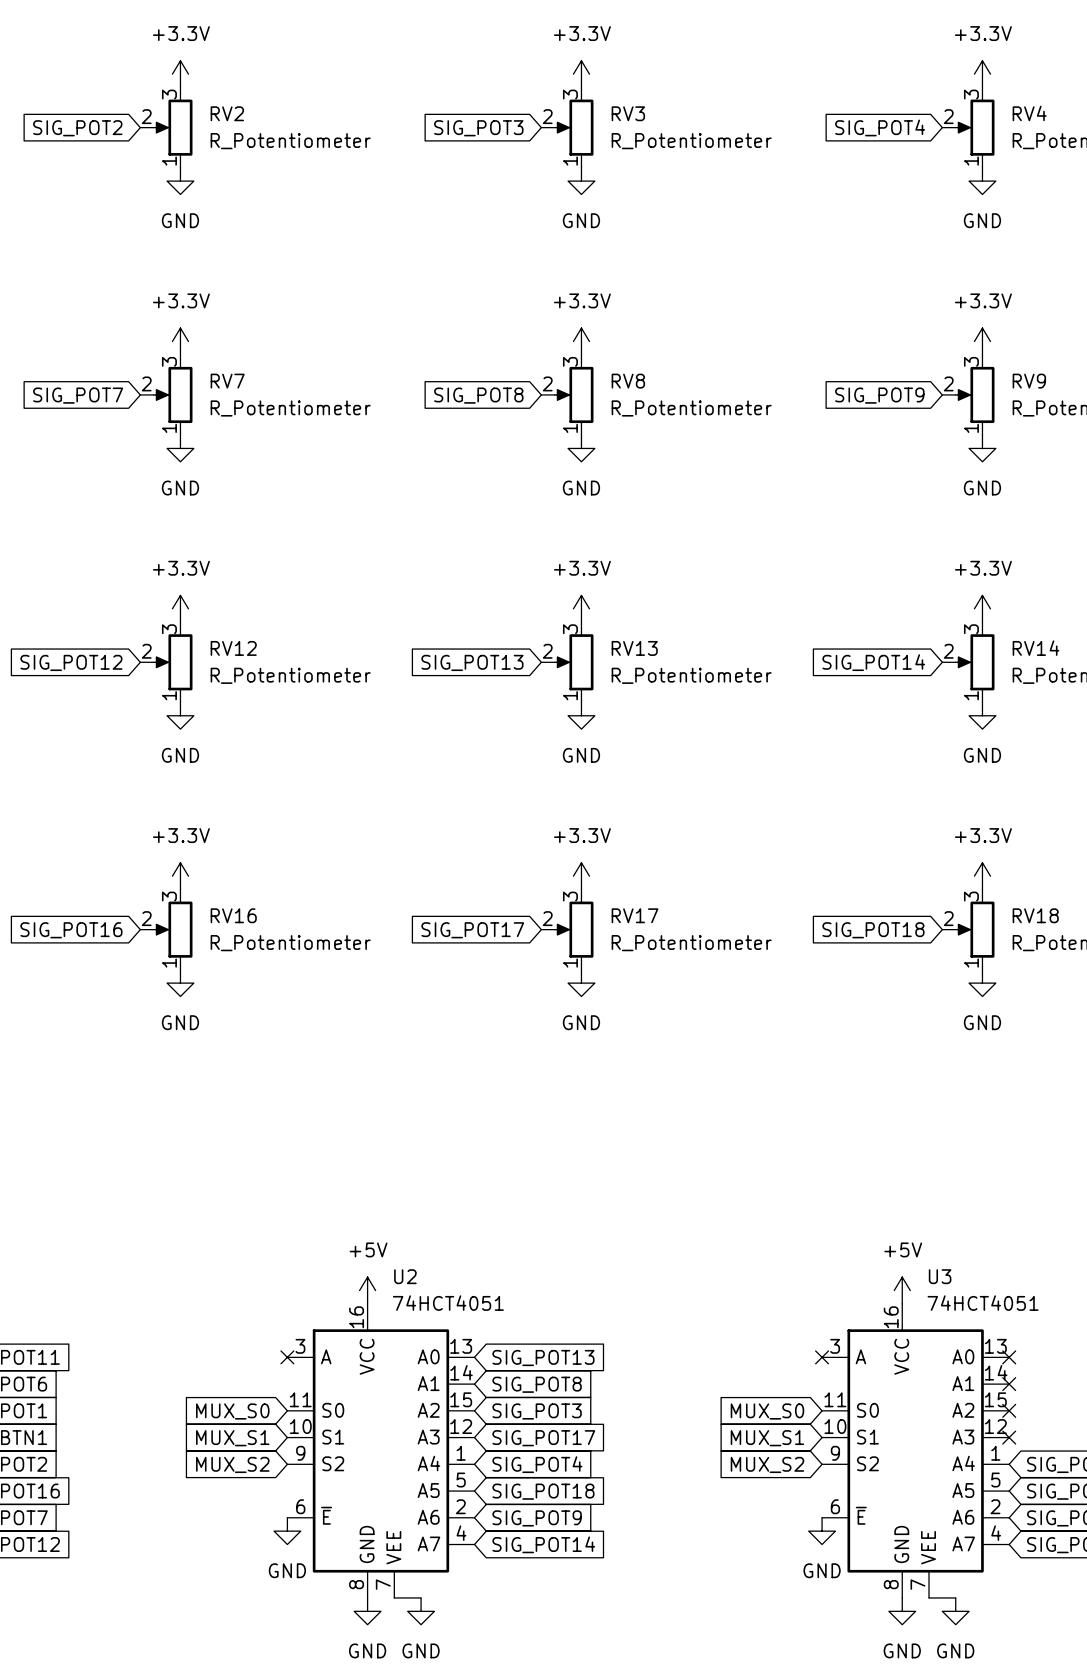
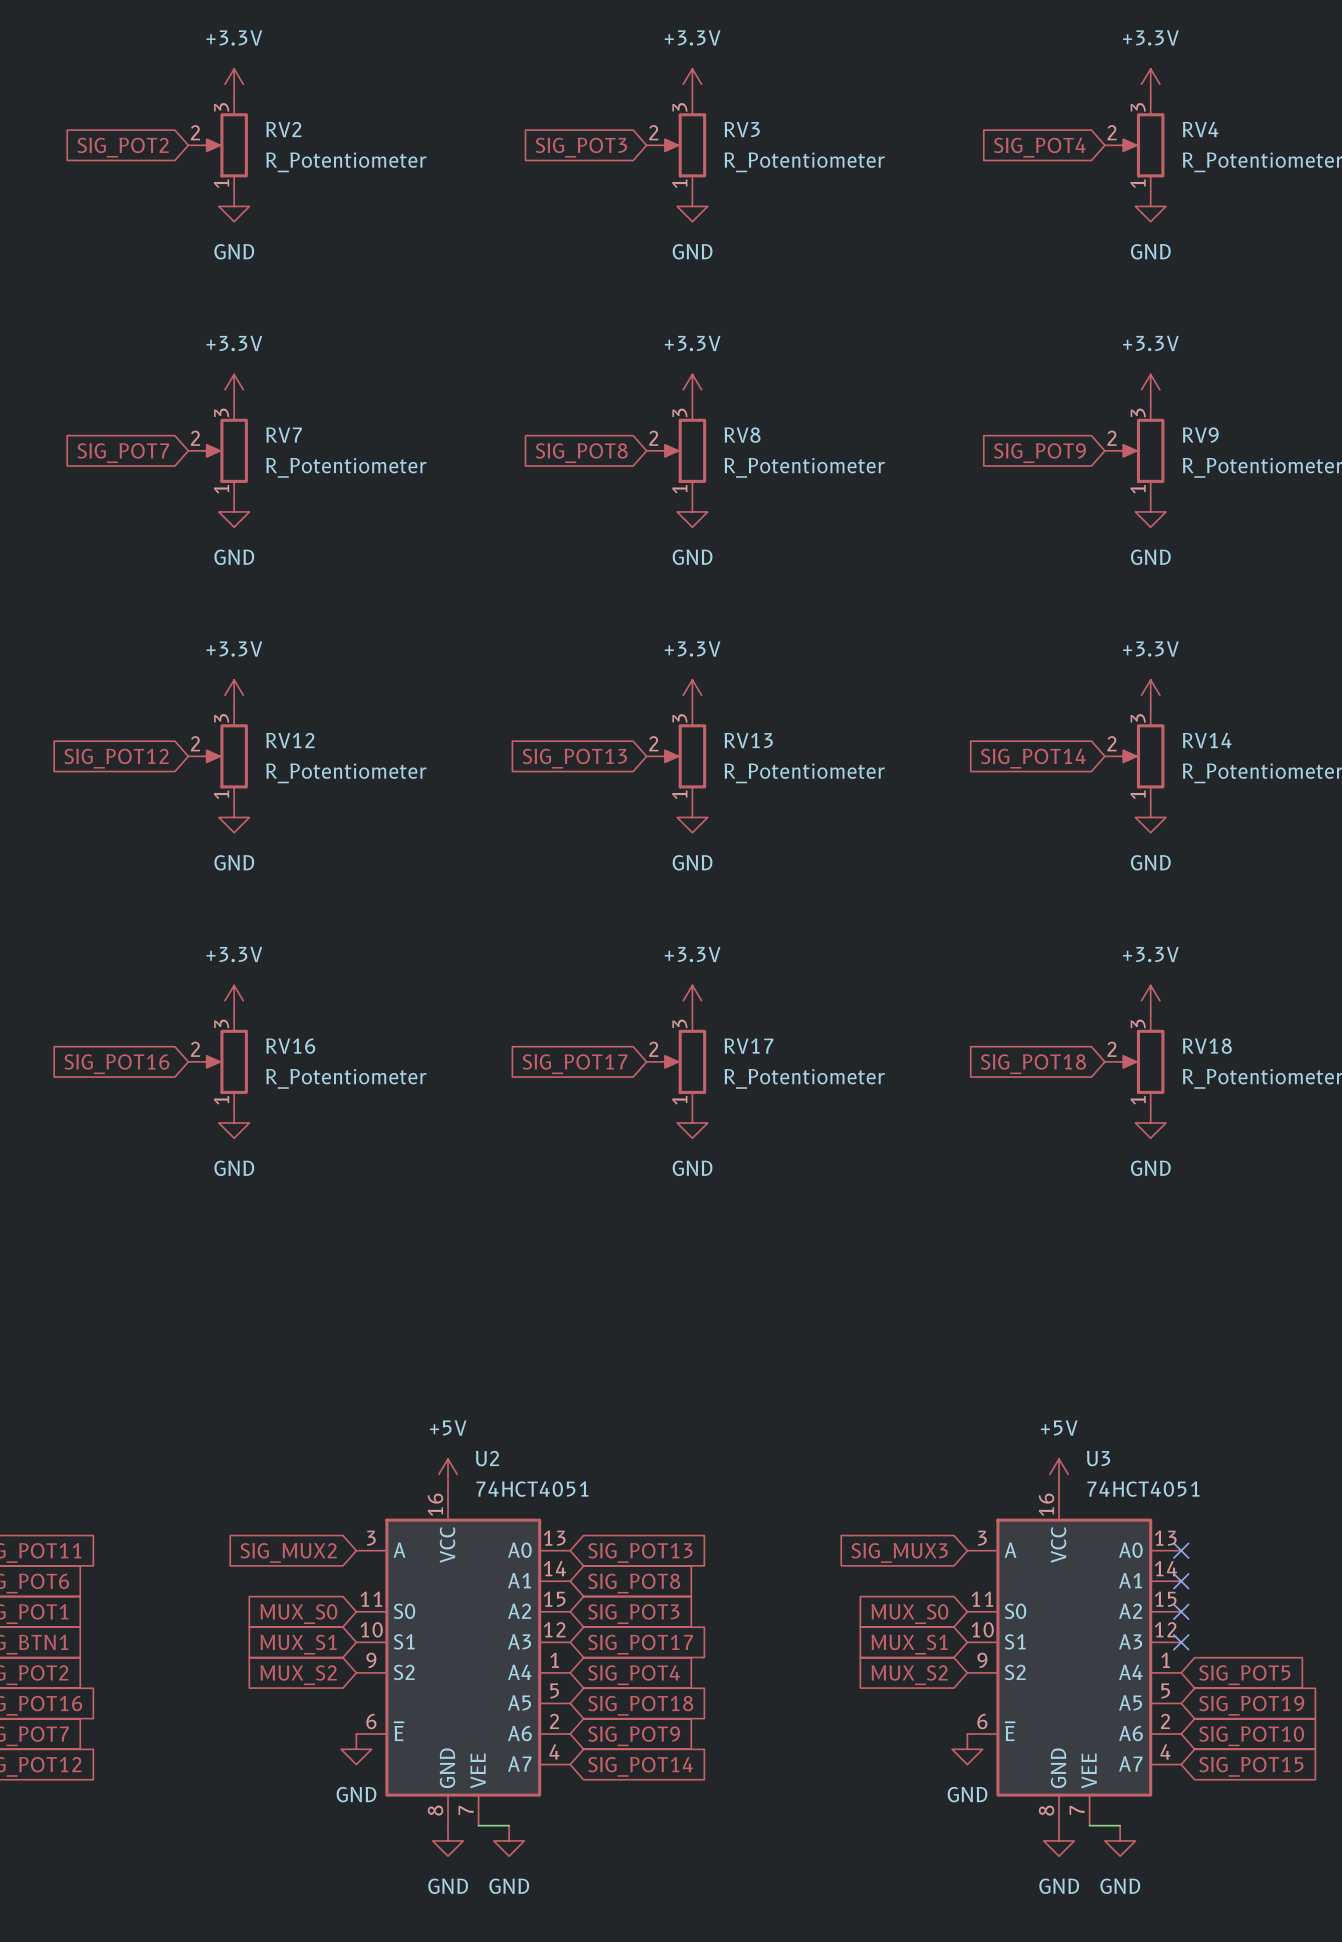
no-connect mark: (287, 1357) -> none
no-connect mark: (822, 1357) -> none
global label: none -> SIG_MUX2 (288, 1552)
global label: none -> SIG_MUX3 (899, 1552)

